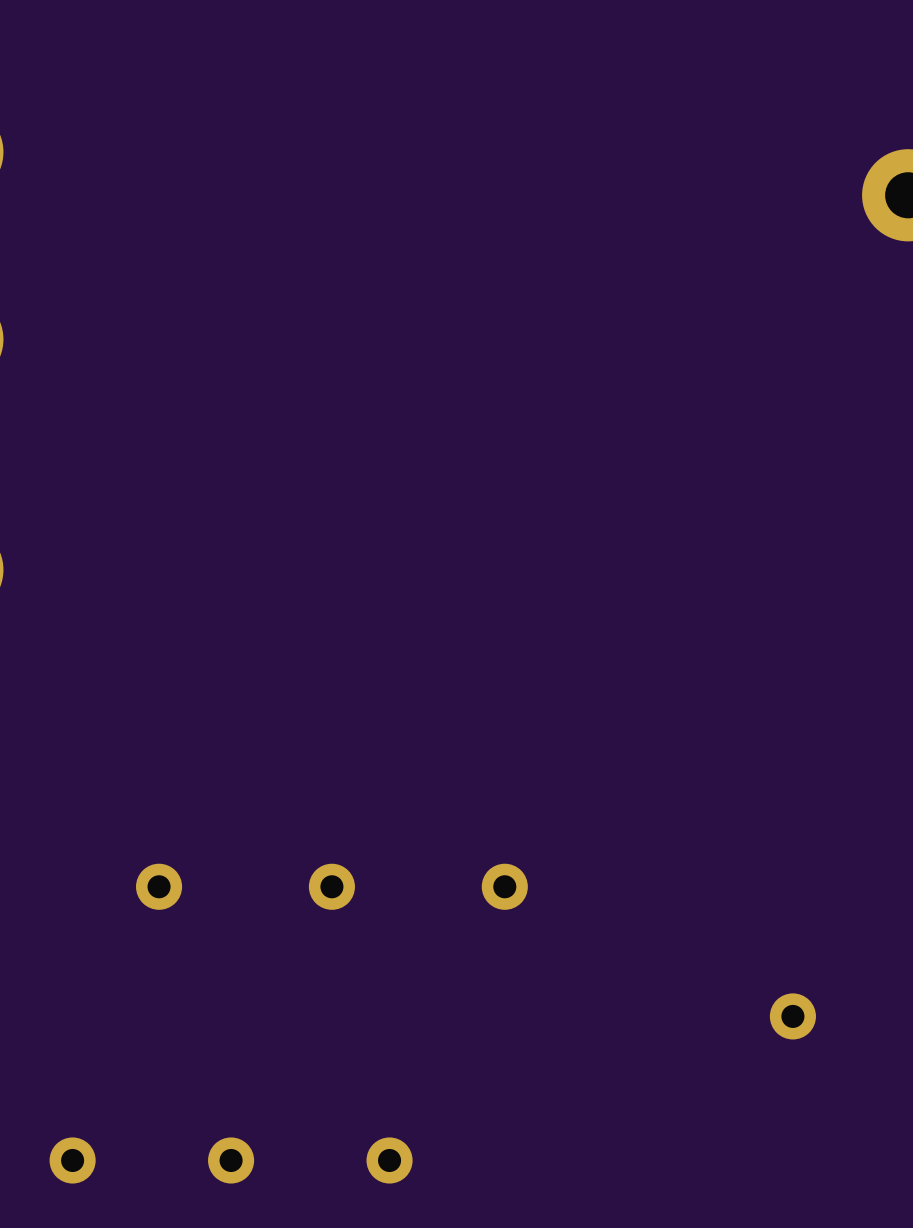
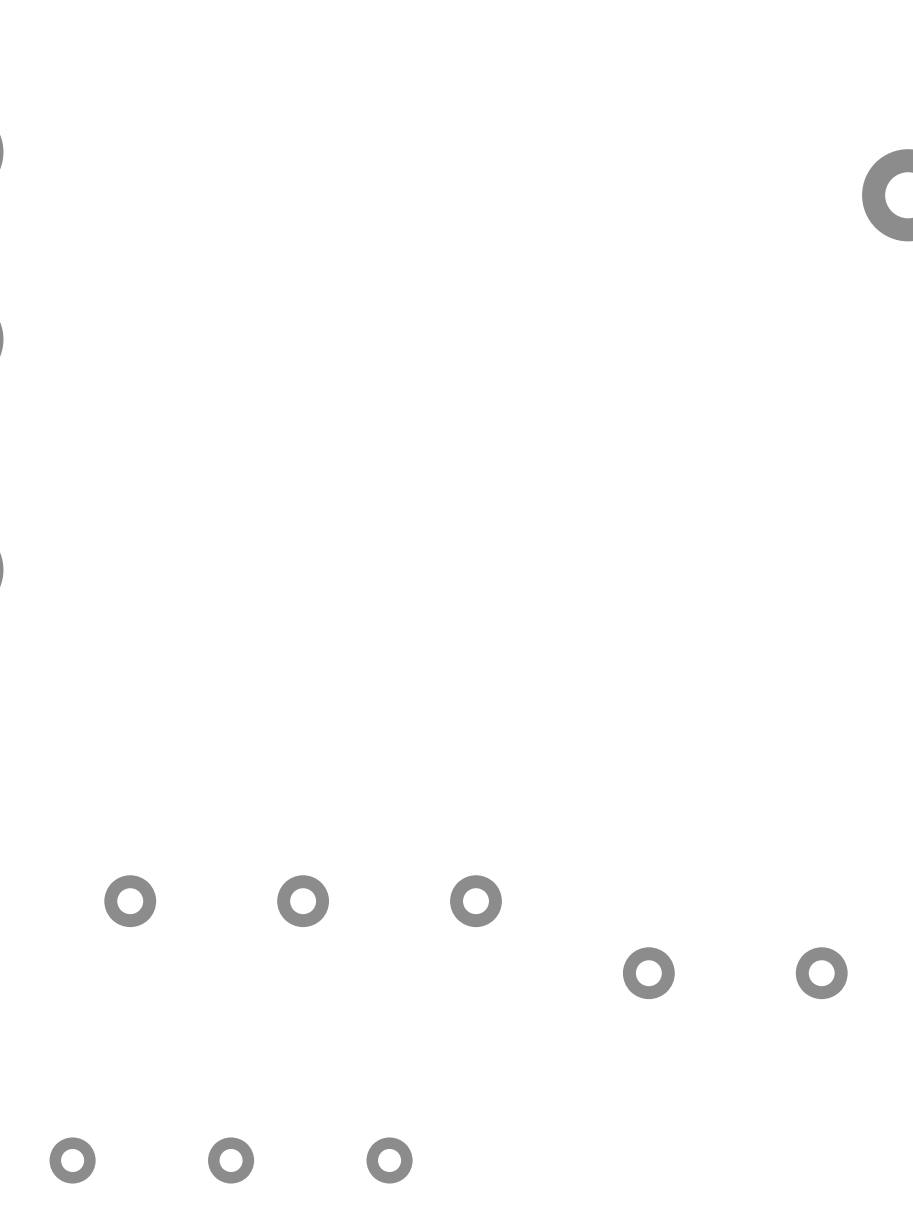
via position: (159, 886) -> (130, 901)
via position: (331, 886) -> (303, 901)
via position: (504, 886) -> (475, 901)
via: none -> (648, 973)
via position: (792, 1016) -> (821, 973)

